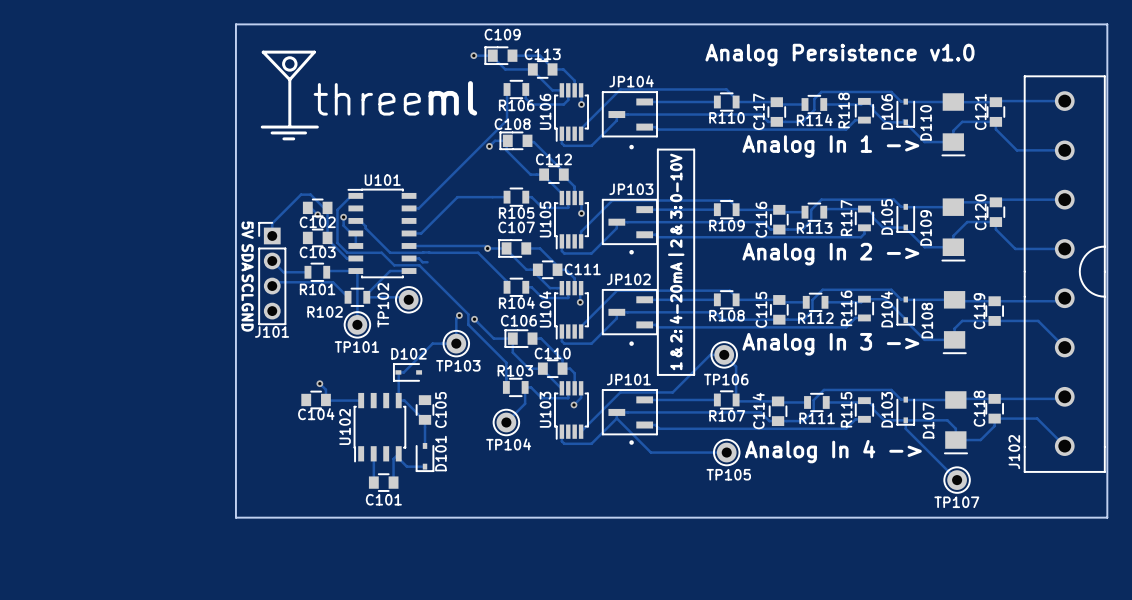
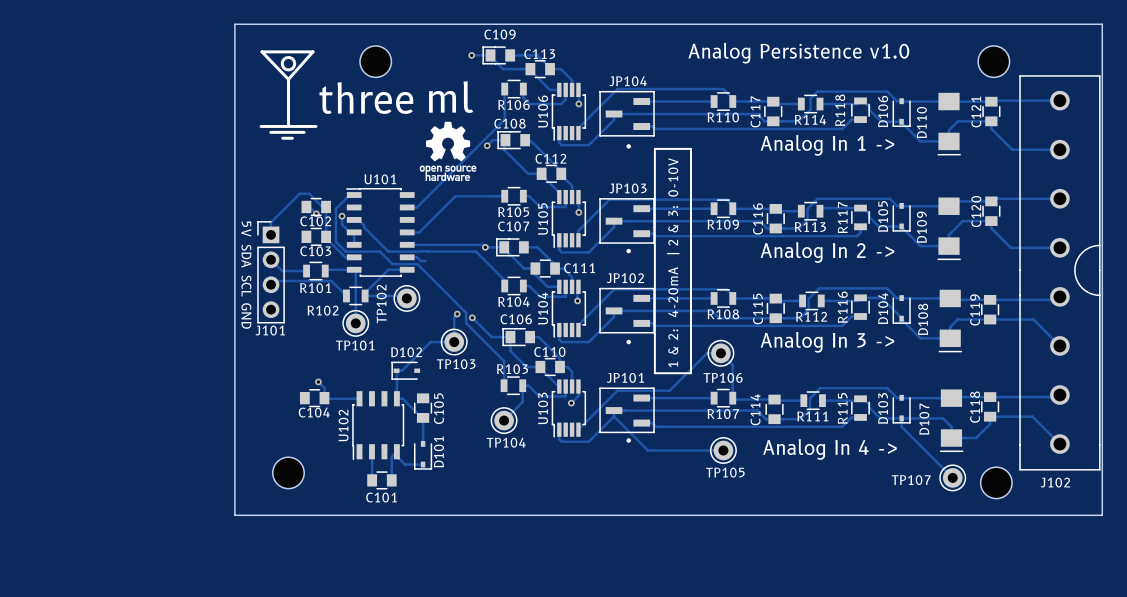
text position: Analog Persistence v1.0 (839, 55) -> Analog Persistence v1.0 (798, 53)
part: none -> (375, 61)
part: none -> (993, 61)
drawing: none -> [419, 121, 477, 182]
J102 name rotation: 0° (1014, 452) -> 90° clockwise (1055, 482)
J102 name position: J102 (1014, 452) -> J102 (1055, 482)
part: none -> (288, 472)
part: none -> (996, 482)
TP107 name position: TP107 (956, 502) -> TP107 (911, 480)

